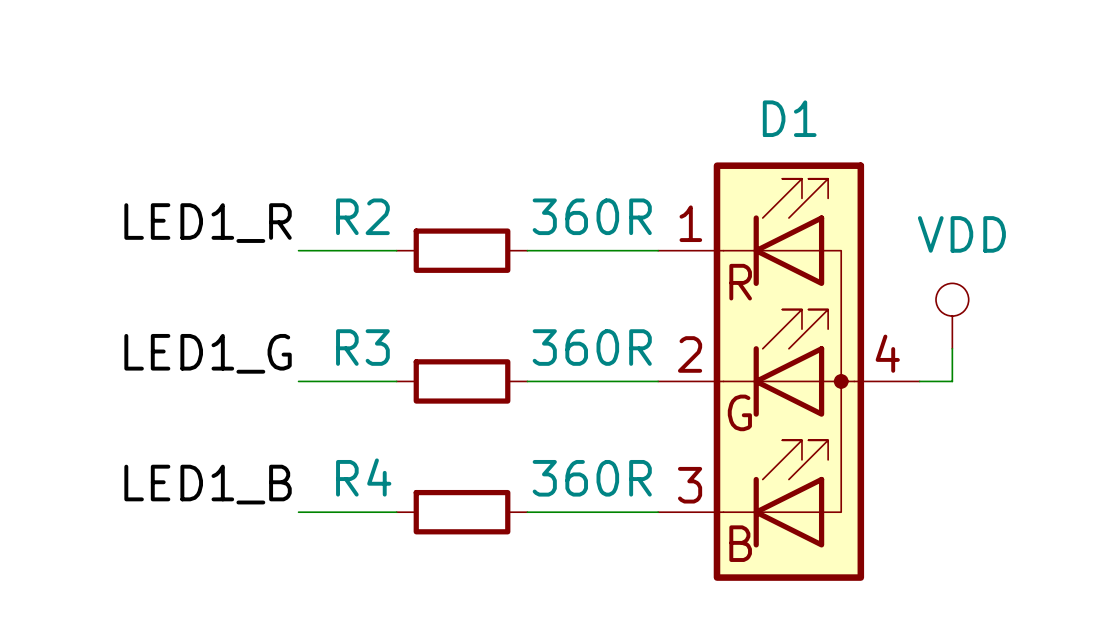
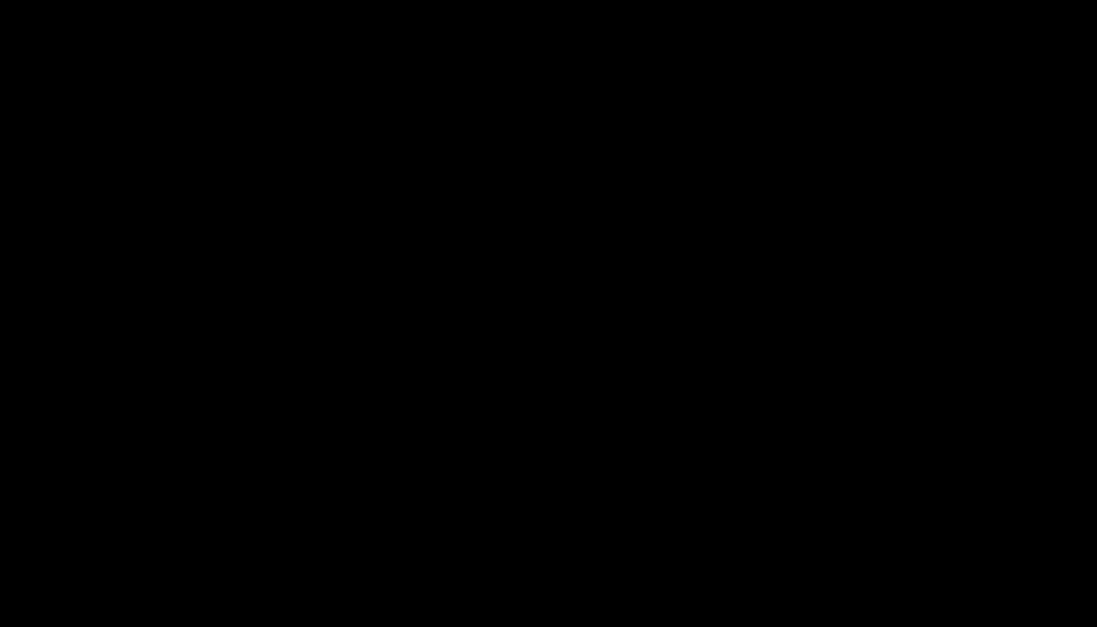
label: LED1_R (208, 223) -> none
wire: (298, 250) (396, 250) -> none
R2: 360R (462, 250) -> none
wire: (527, 250) (658, 250) -> none
power symbol: VDD (952, 316) -> none
wire: (952, 348) (952, 381) (919, 381) -> none
label: LED1_G (208, 353) -> none
D1: (788, 371) -> none
wire: (298, 381) (396, 381) -> none
R3: 360R (462, 381) -> none
wire: (527, 381) (658, 381) -> none
label: LED1_B (208, 484) -> none
wire: (298, 512) (396, 512) -> none
R4: 360R (462, 512) -> none
wire: (527, 512) (658, 512) -> none

